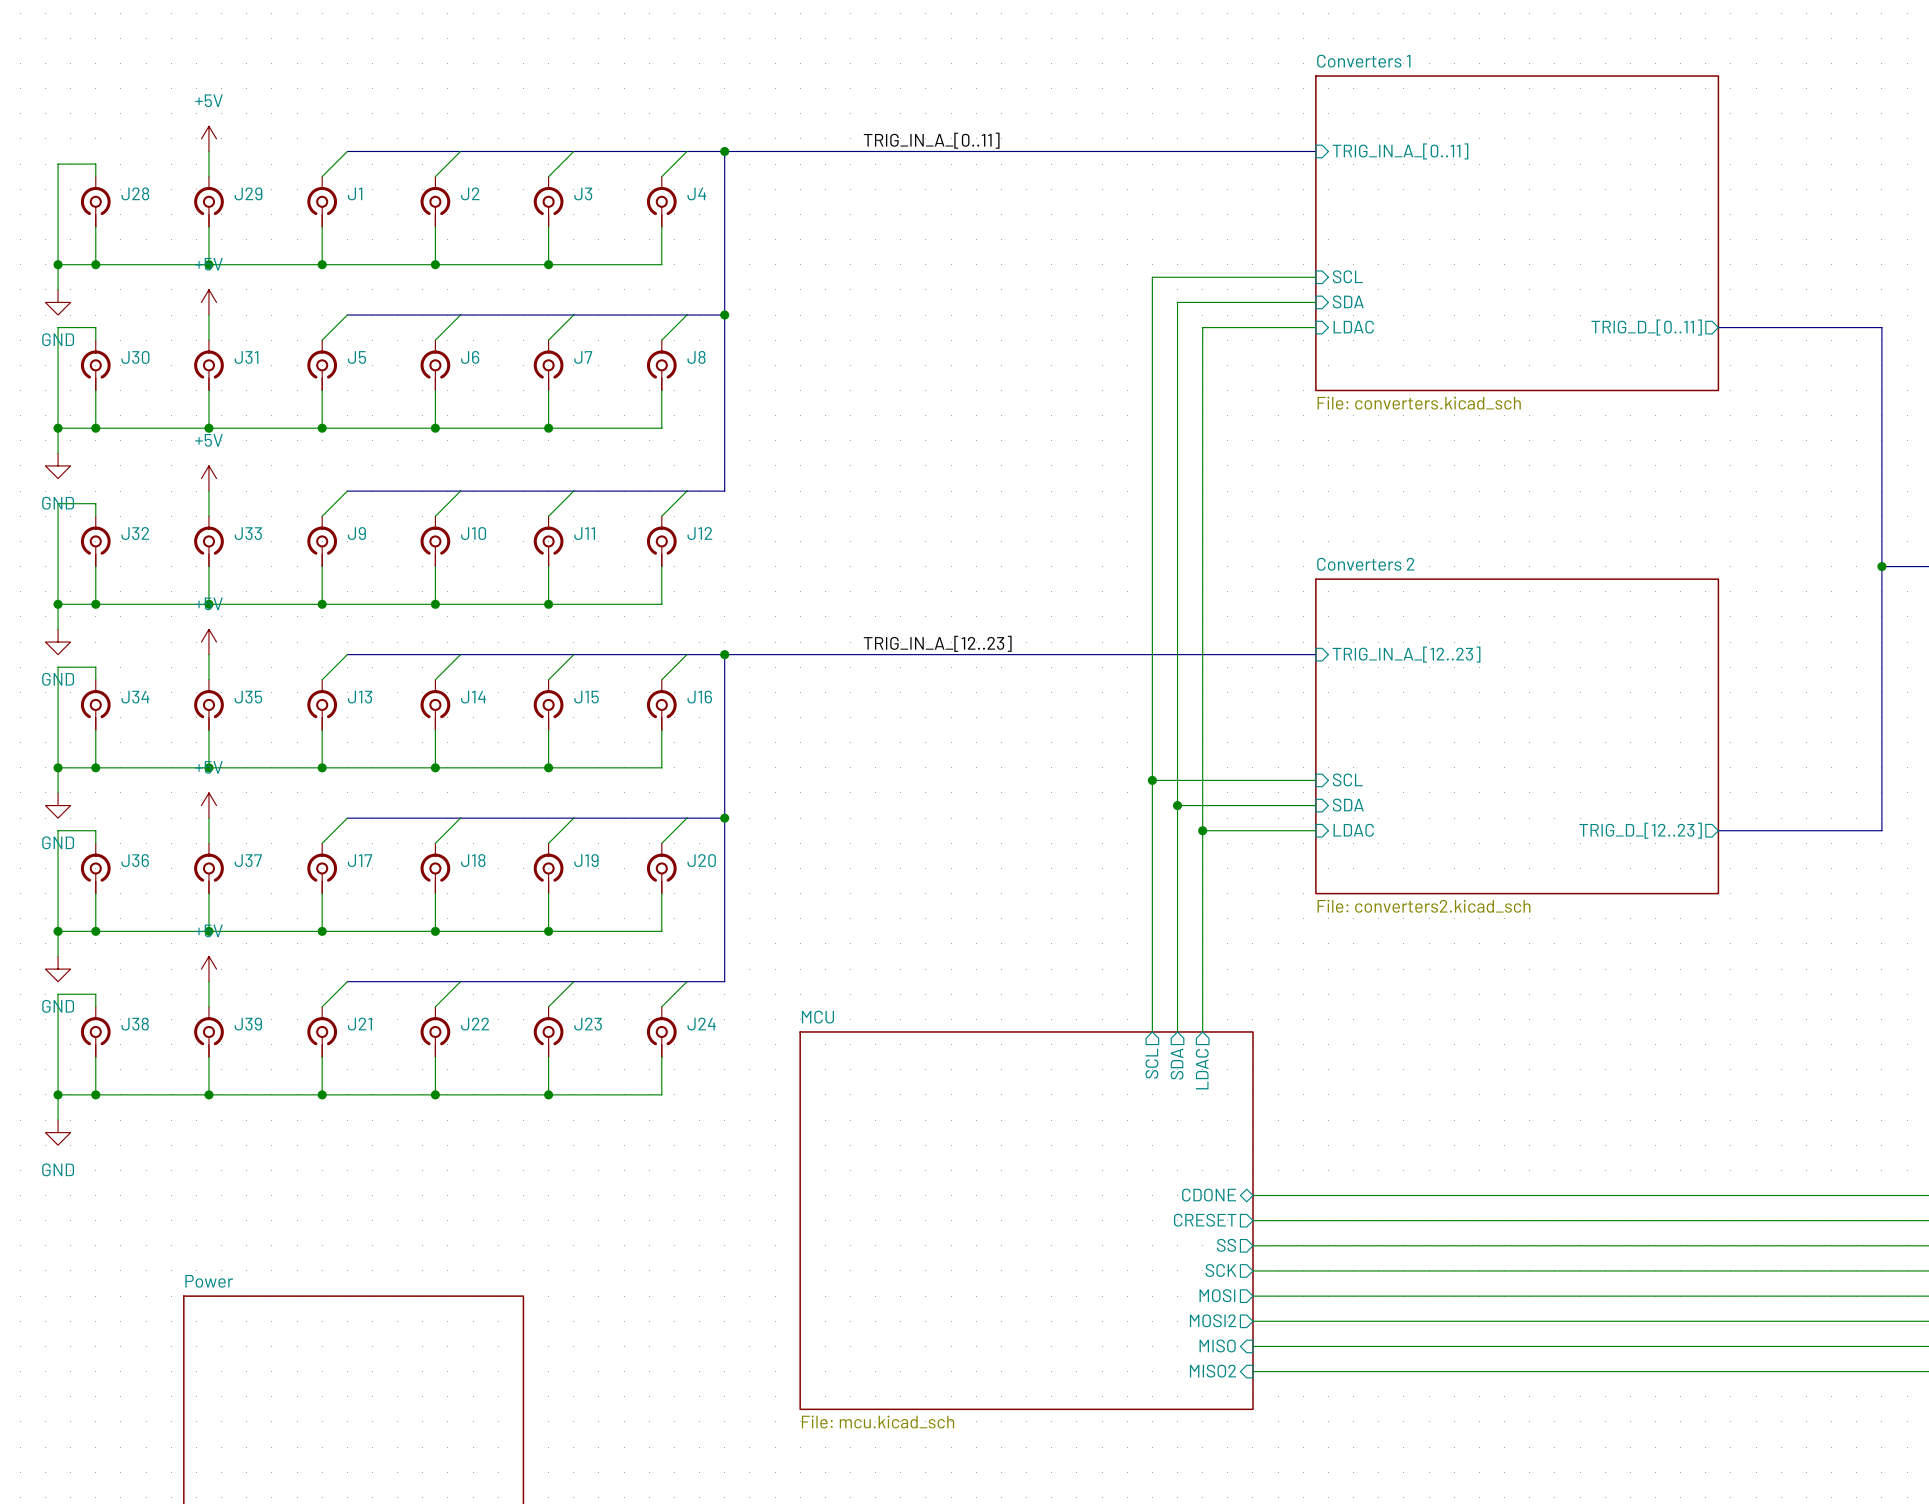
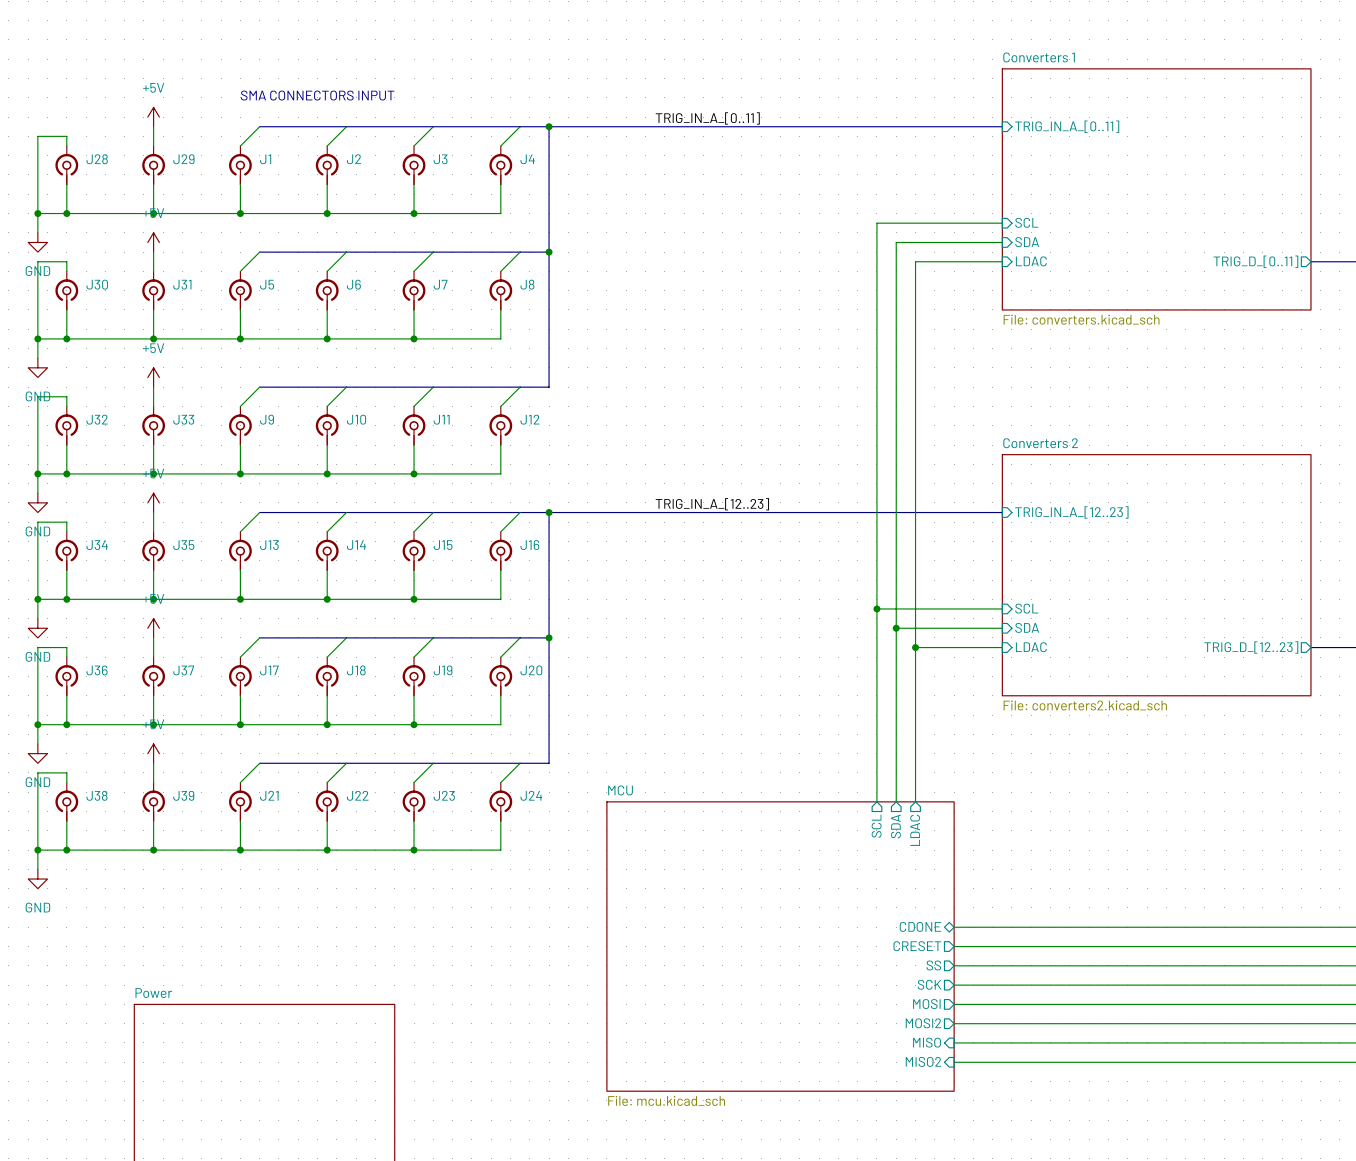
text: none -> SMA CONNECTORS INPUT (317, 95)

